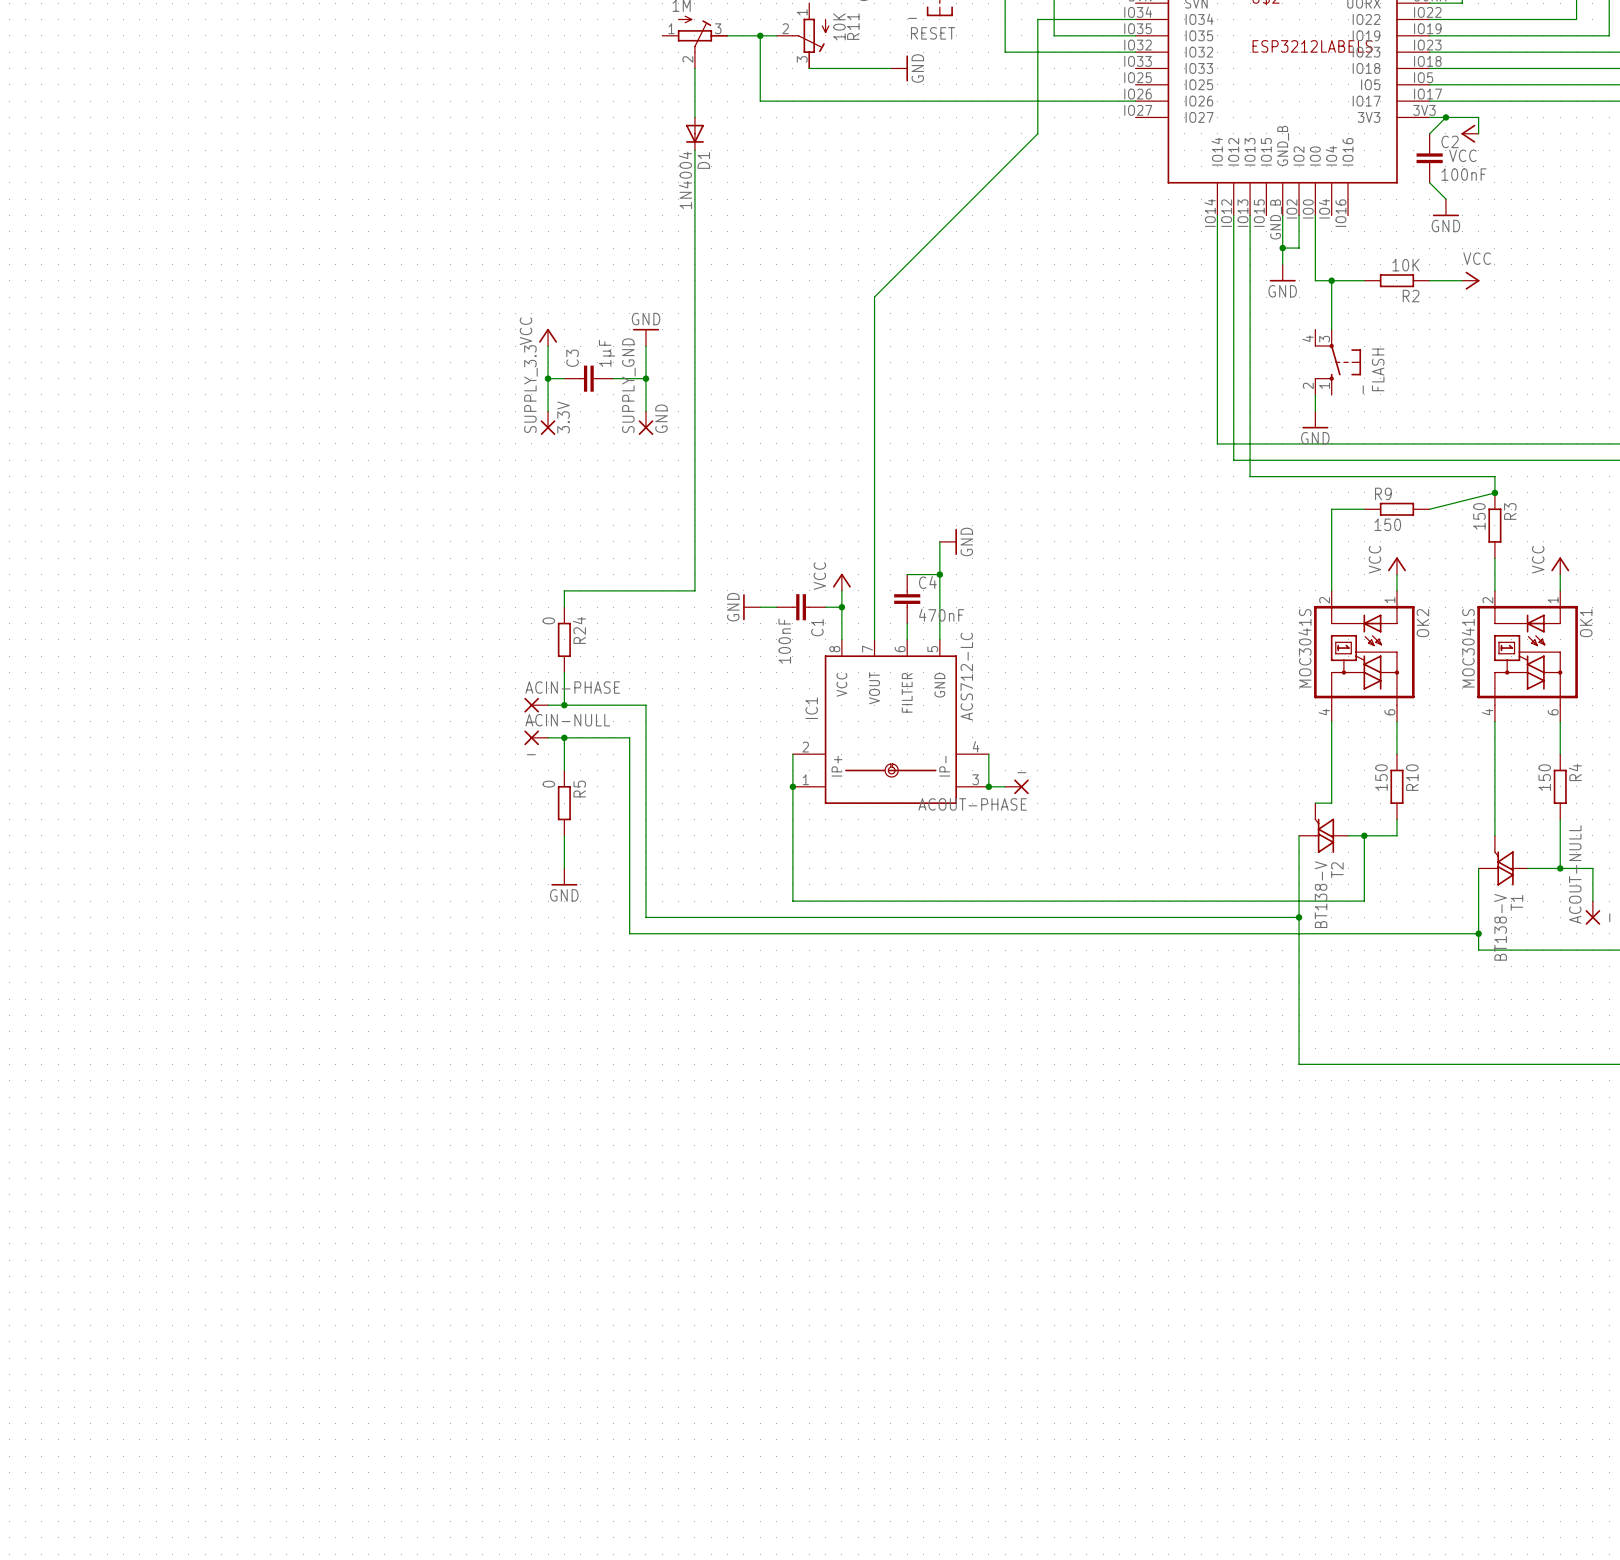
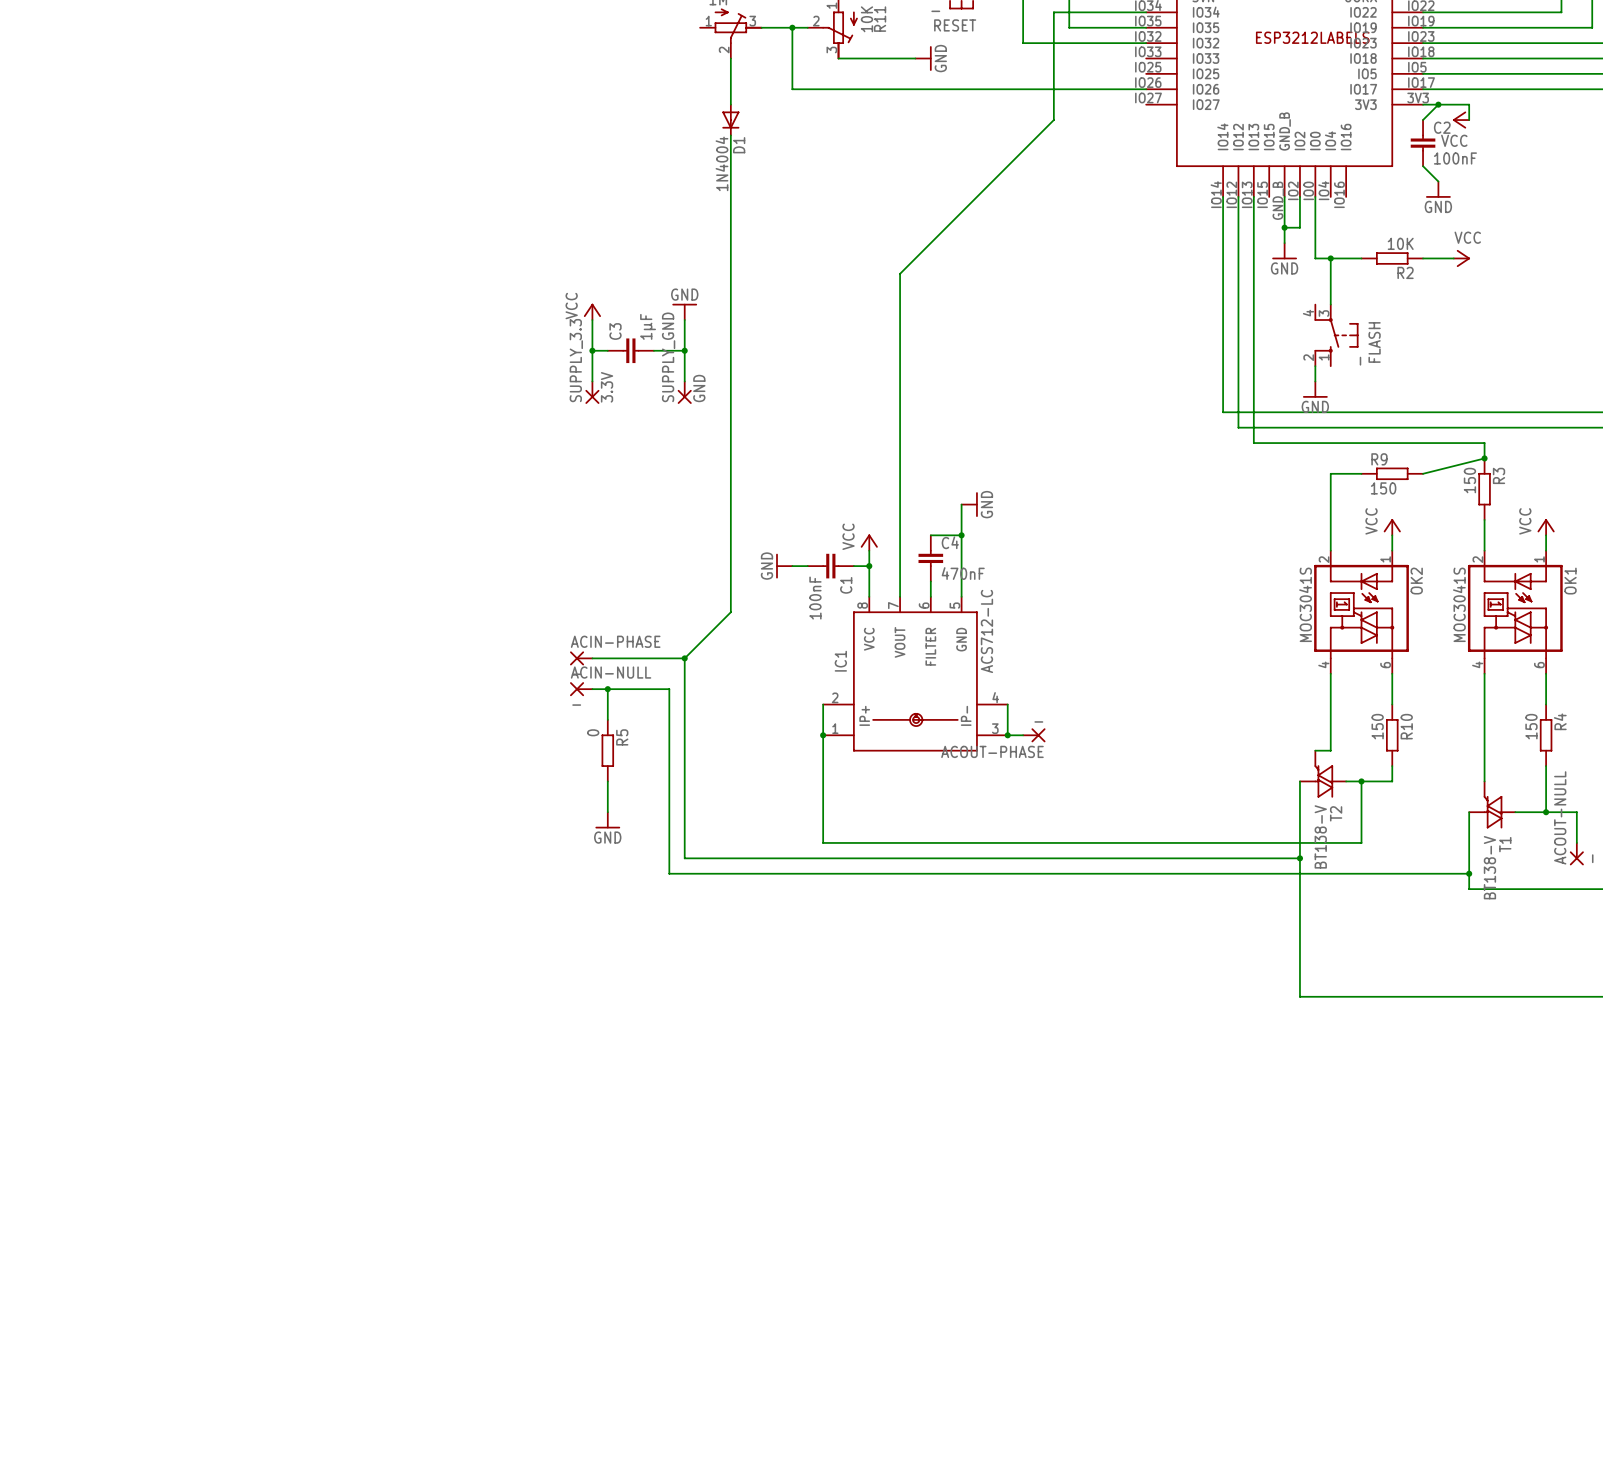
wire: (694, 590) (564, 590) (564, 607) -> (730, 550) (730, 612) (684, 658)
R24: 0 (564, 639) -> none
wire: (564, 672) (564, 705) -> none
junction: (564, 705) -> none
junction: none -> (684, 658)

